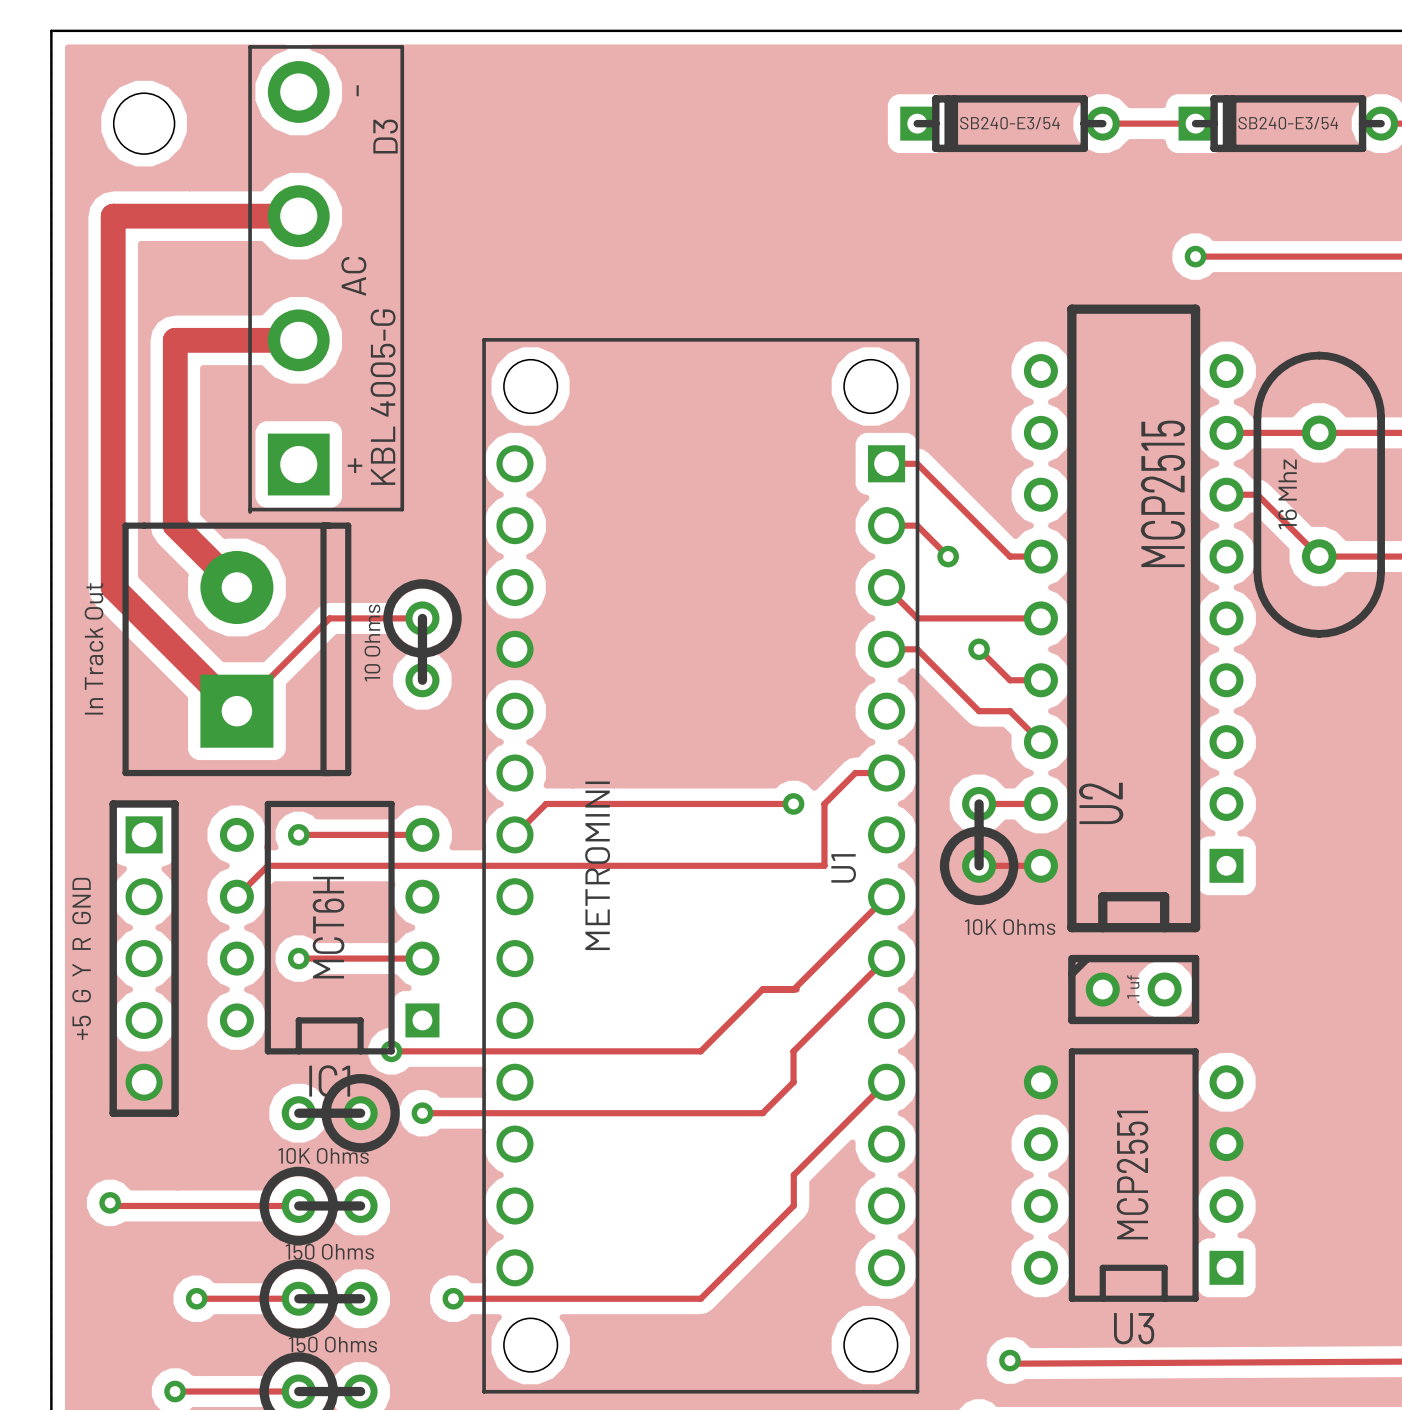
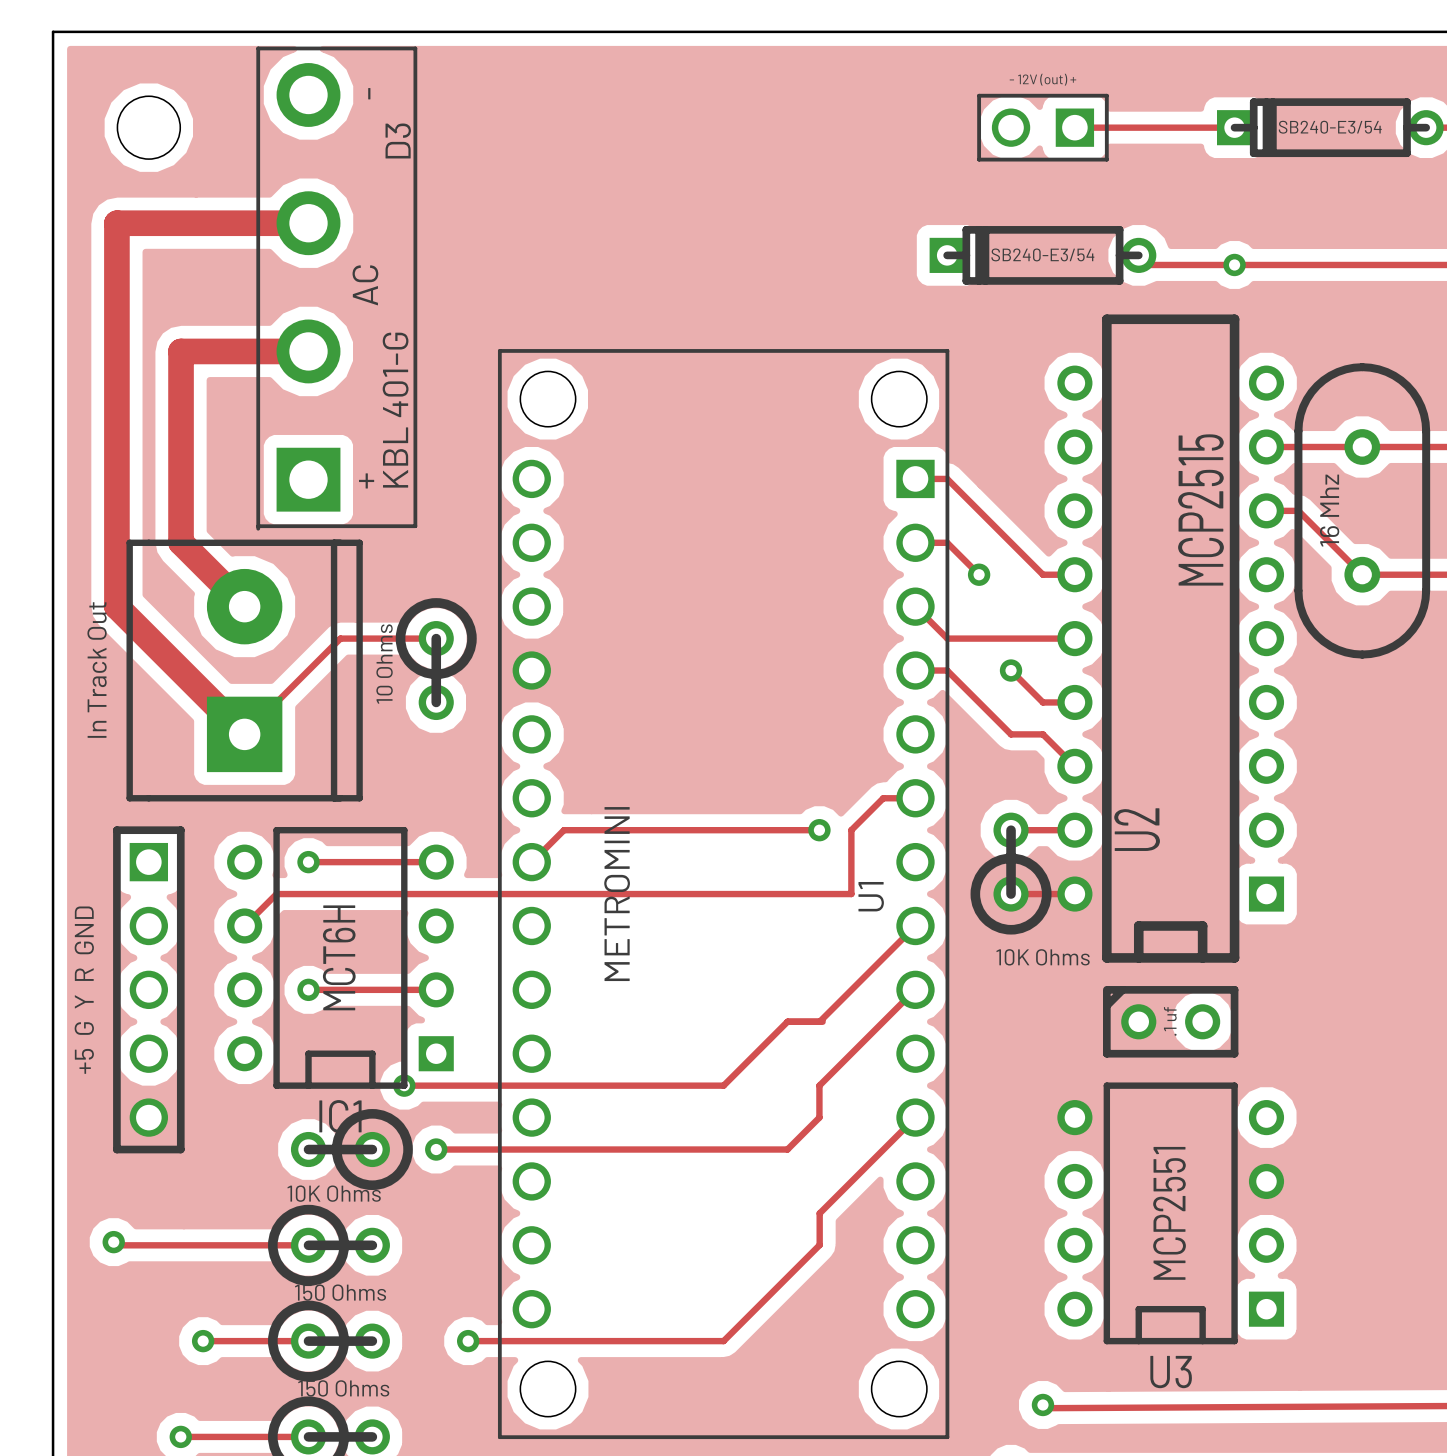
part footprint: [900, 95, 1120, 153] -> [977, 93, 1109, 162]
part value: SB240-E3/54 (1009, 123) -> - 12V (out) + (1042, 79)
track: none -> (1074, 127) (1138, 127)
part: none -> SB240-E3/54 (1042, 255)
track: none -> (1138, 255) (1148, 264) (1234, 264)
D3 value: KBL 4005-G (383, 397) -> KBL 401-G (395, 410)

